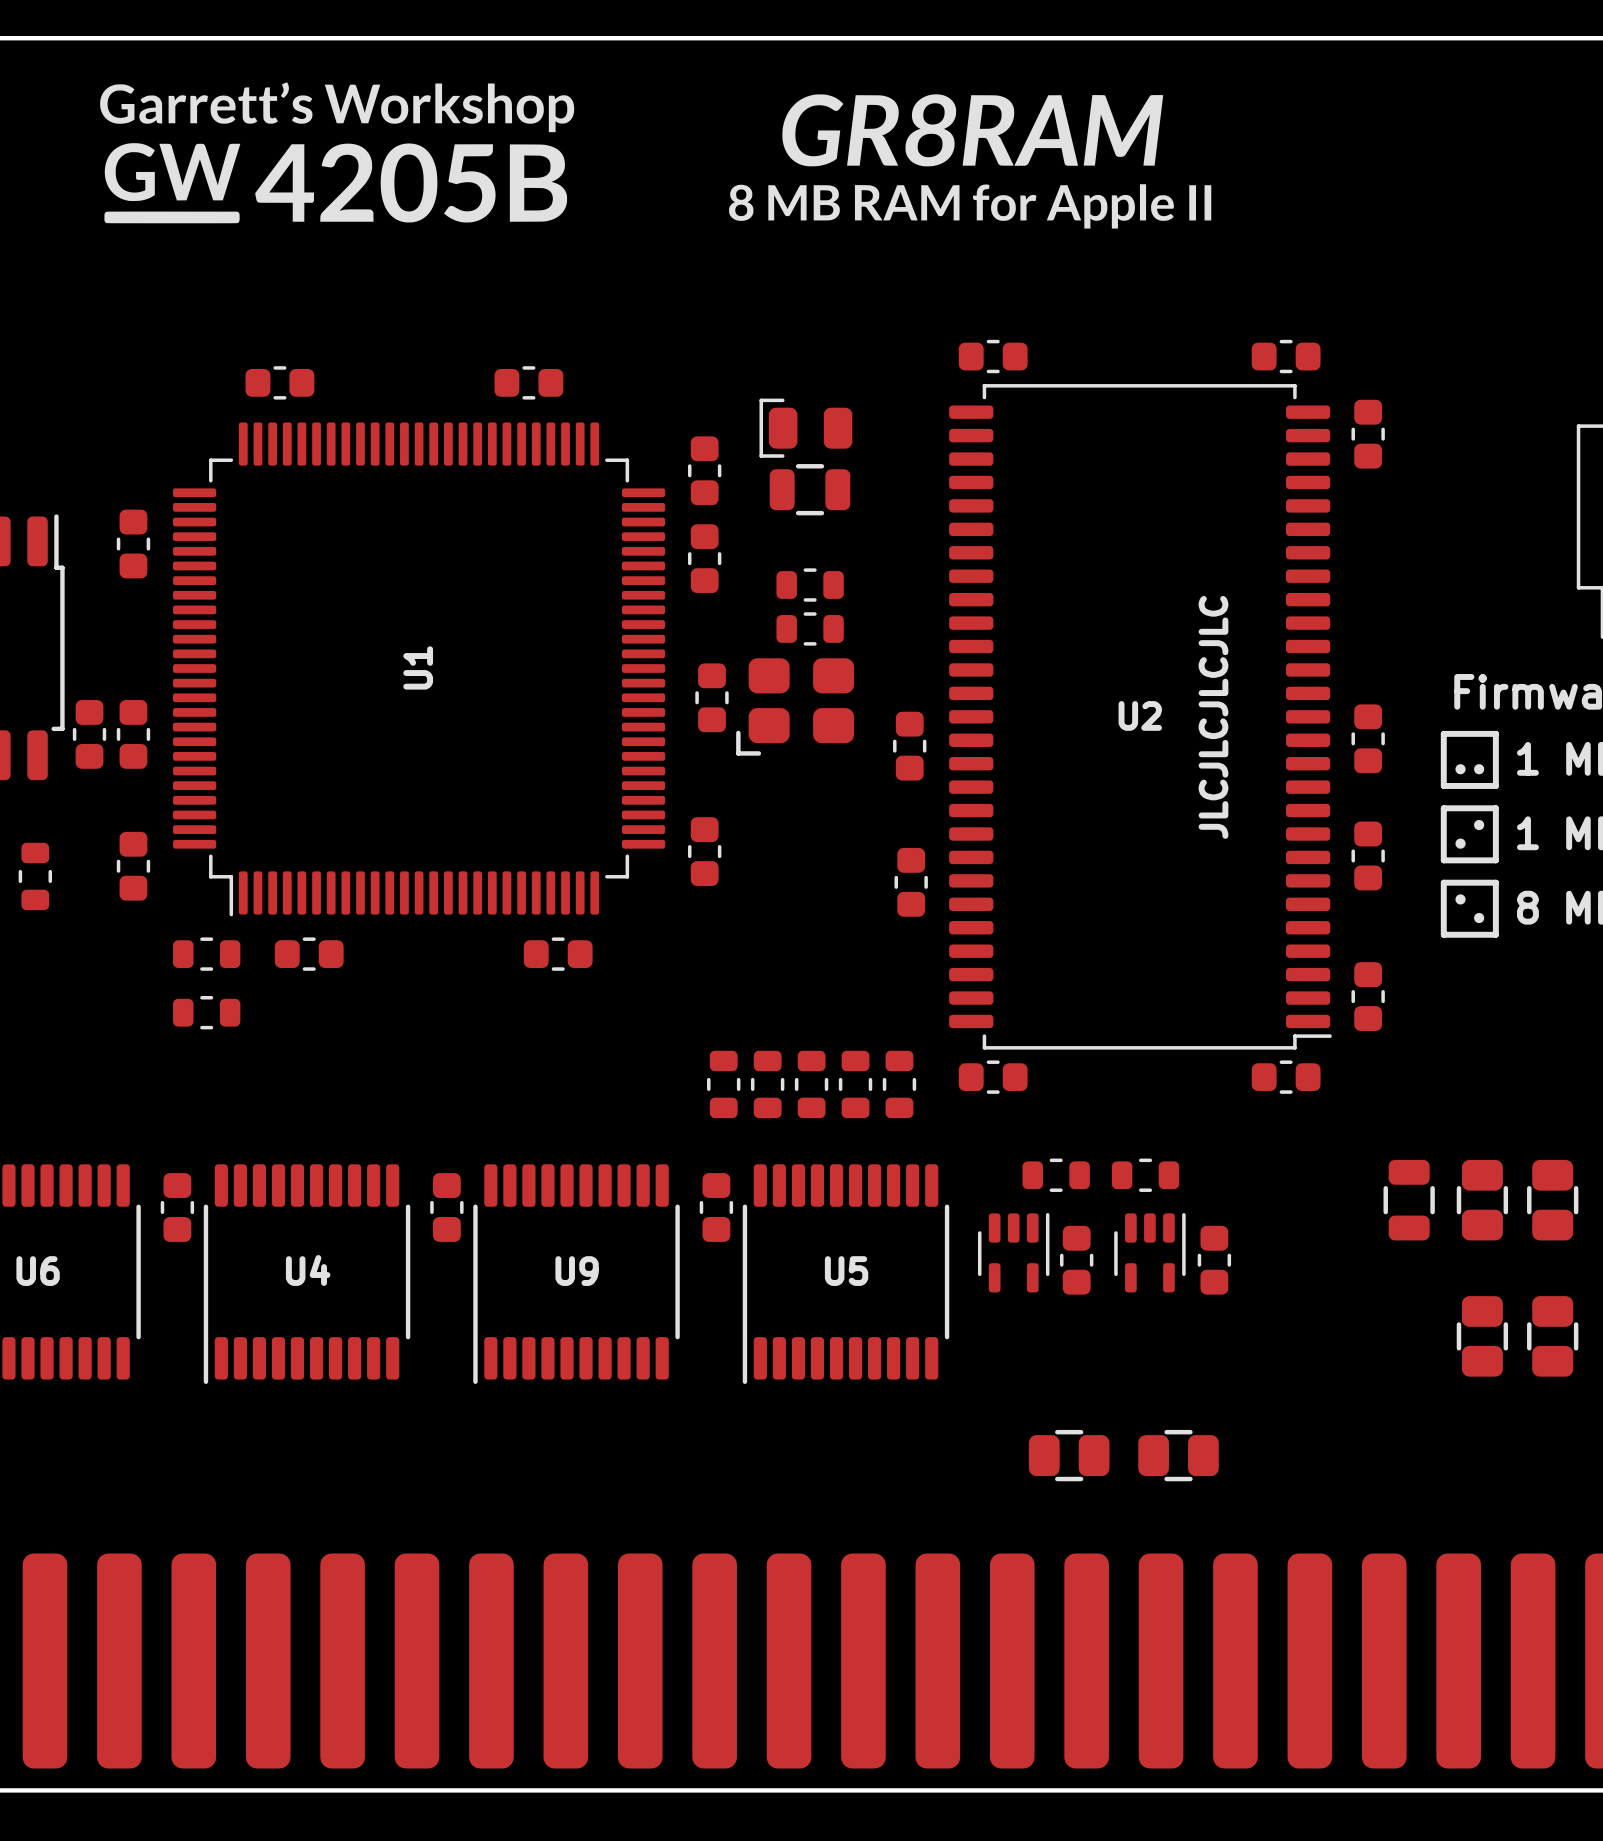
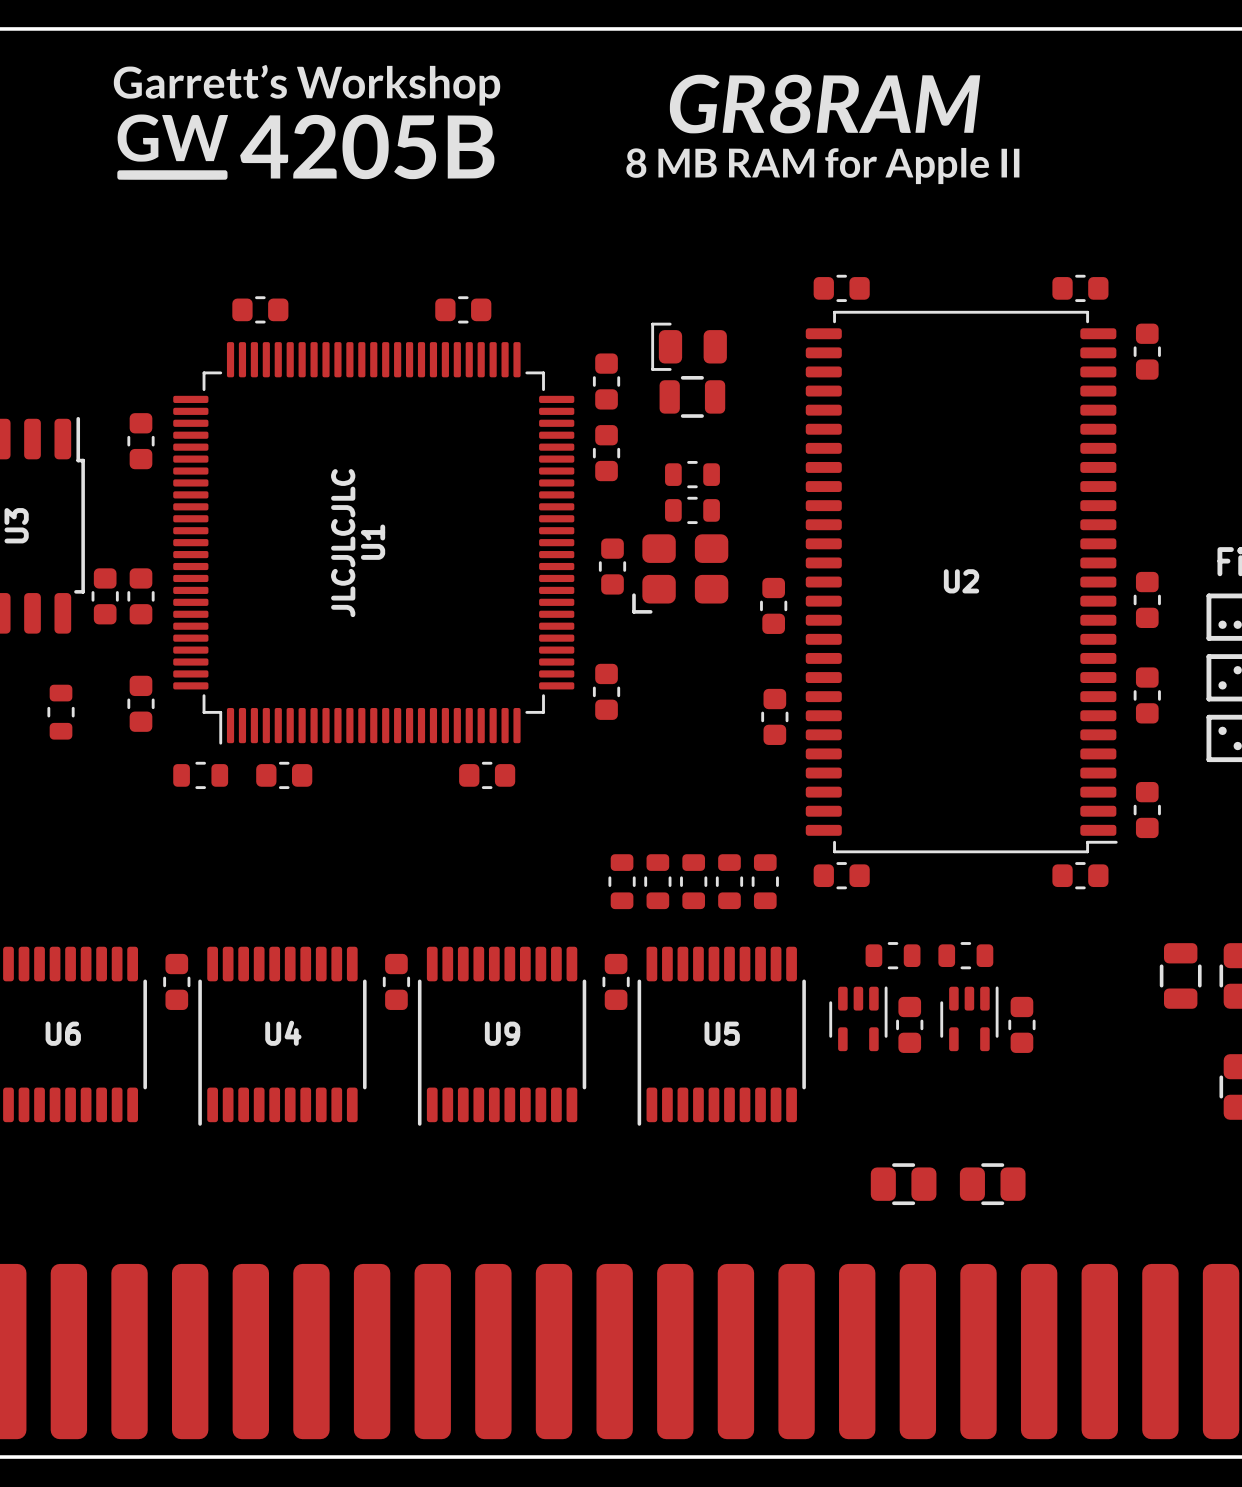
text: none -> JLCJLCJLC (343, 543)
text: JLCJLCJLCJLC (1213, 717) -> none
part: (206, 1012) -> none

